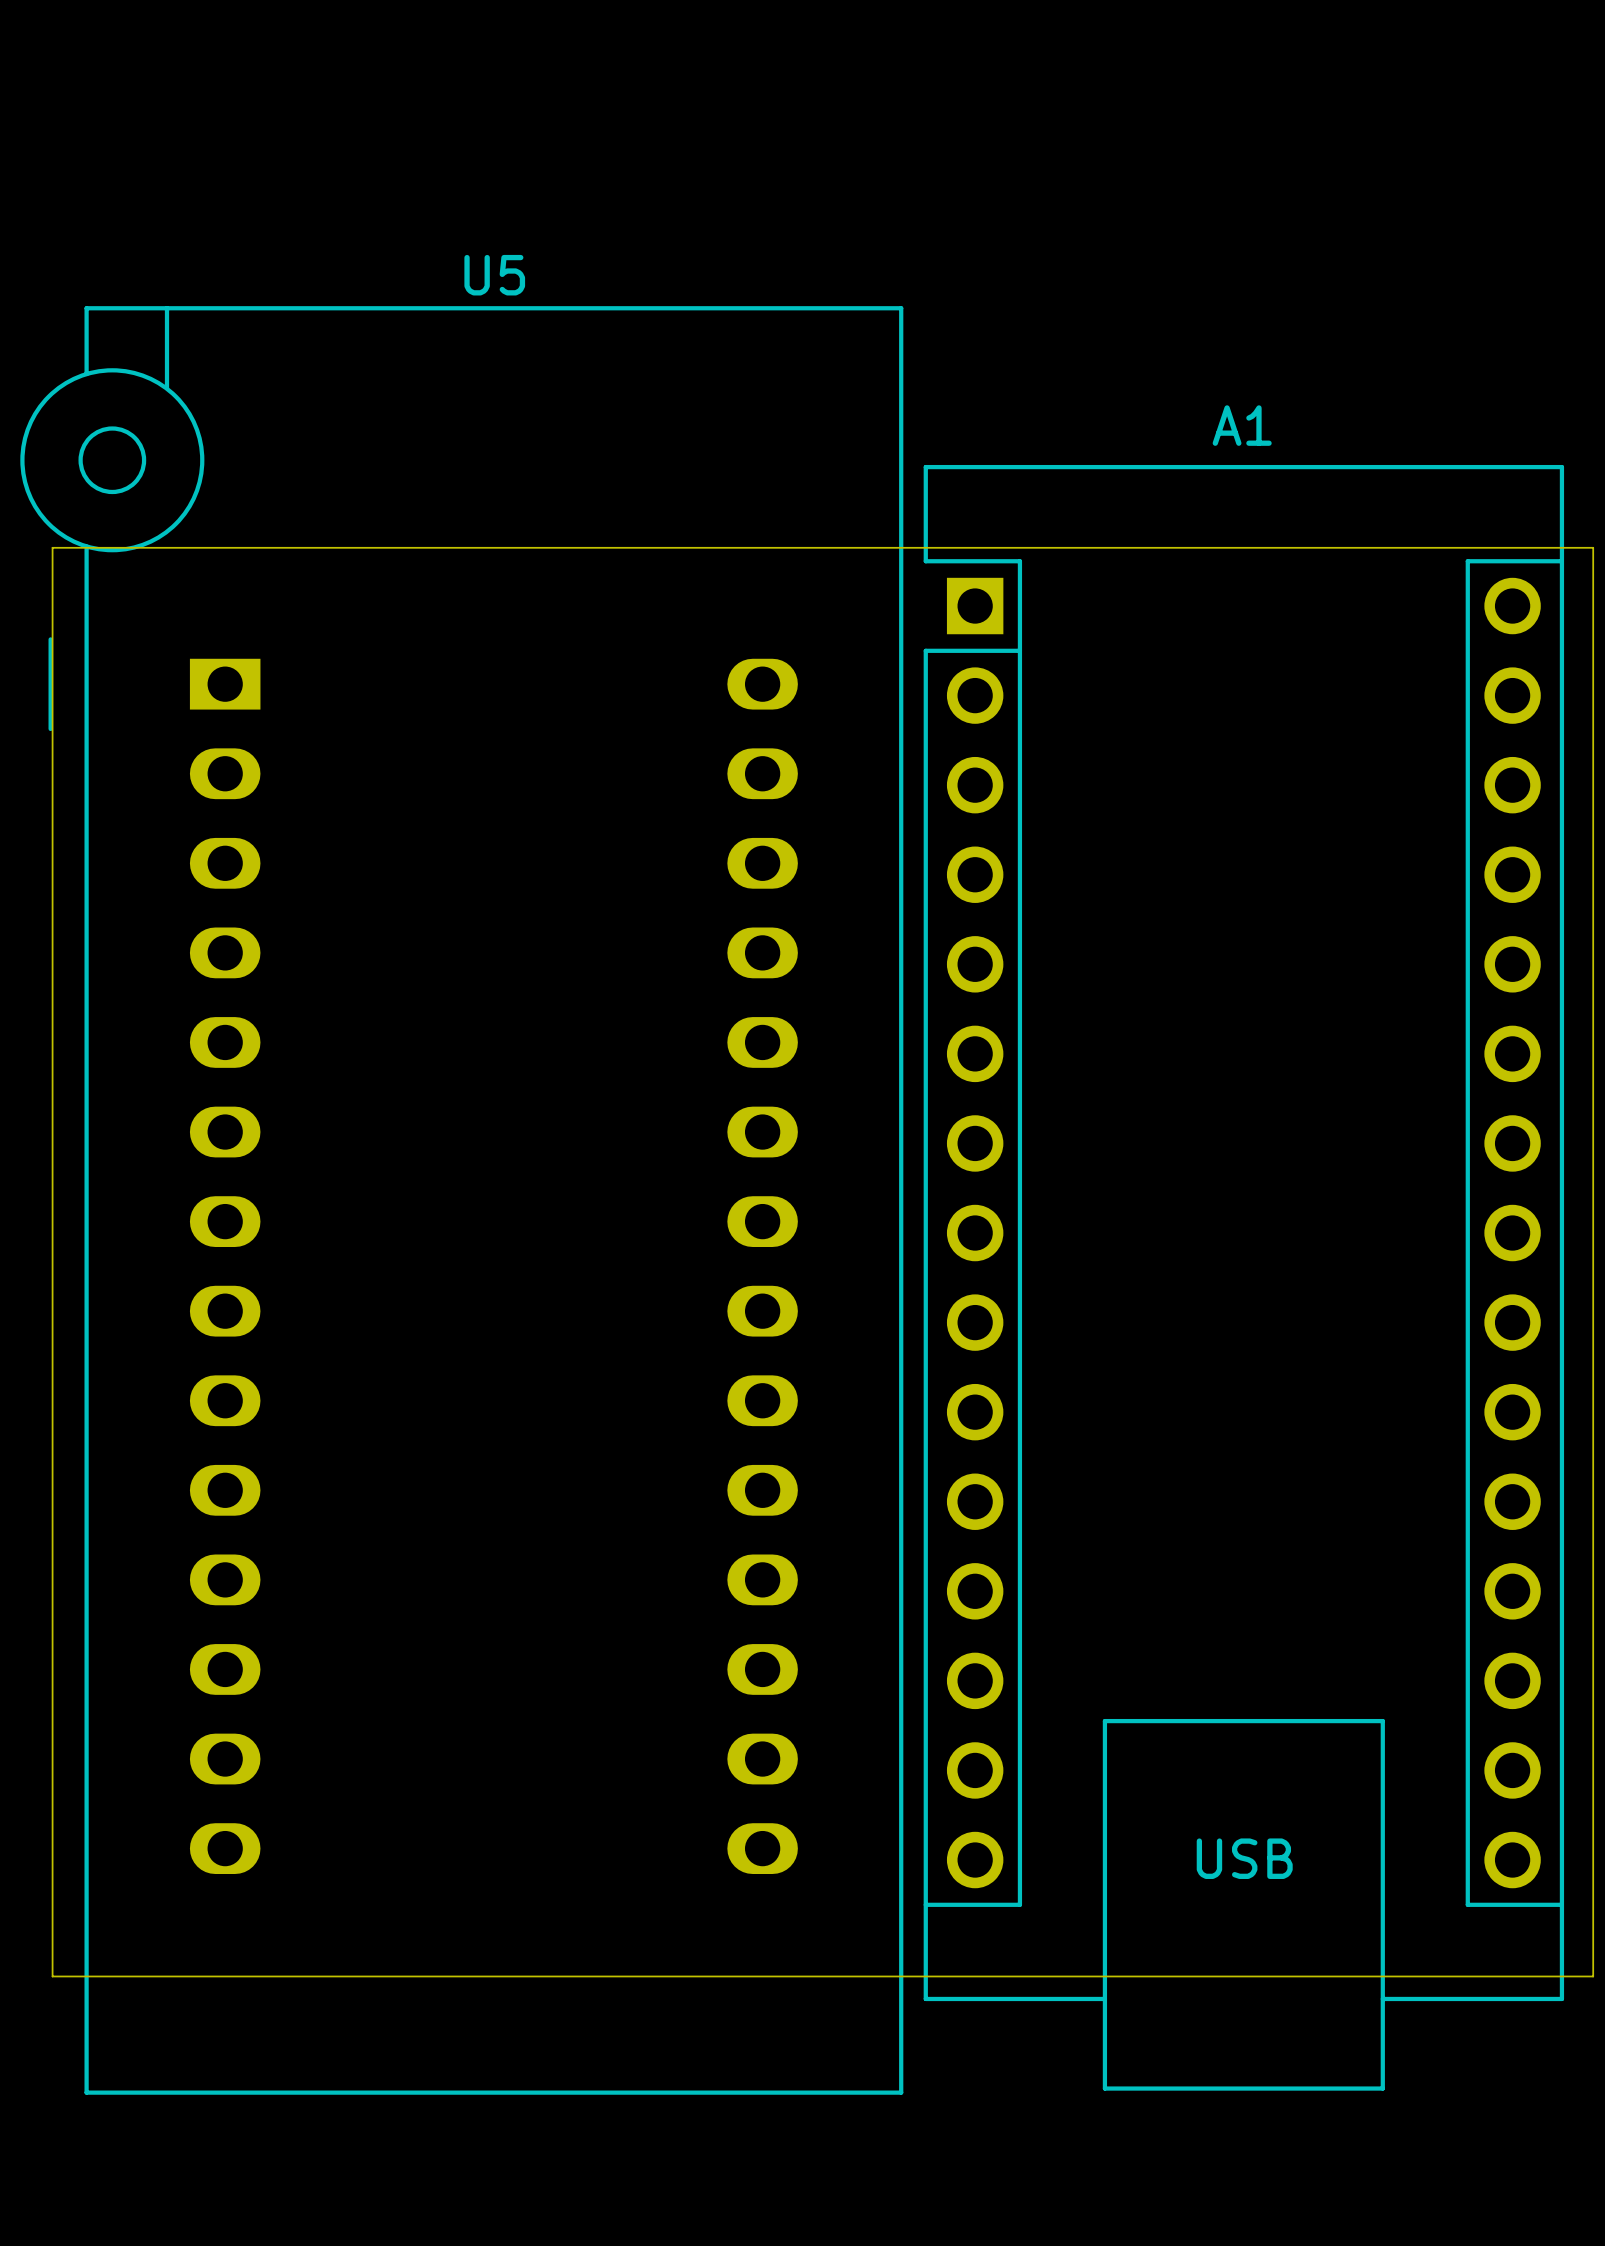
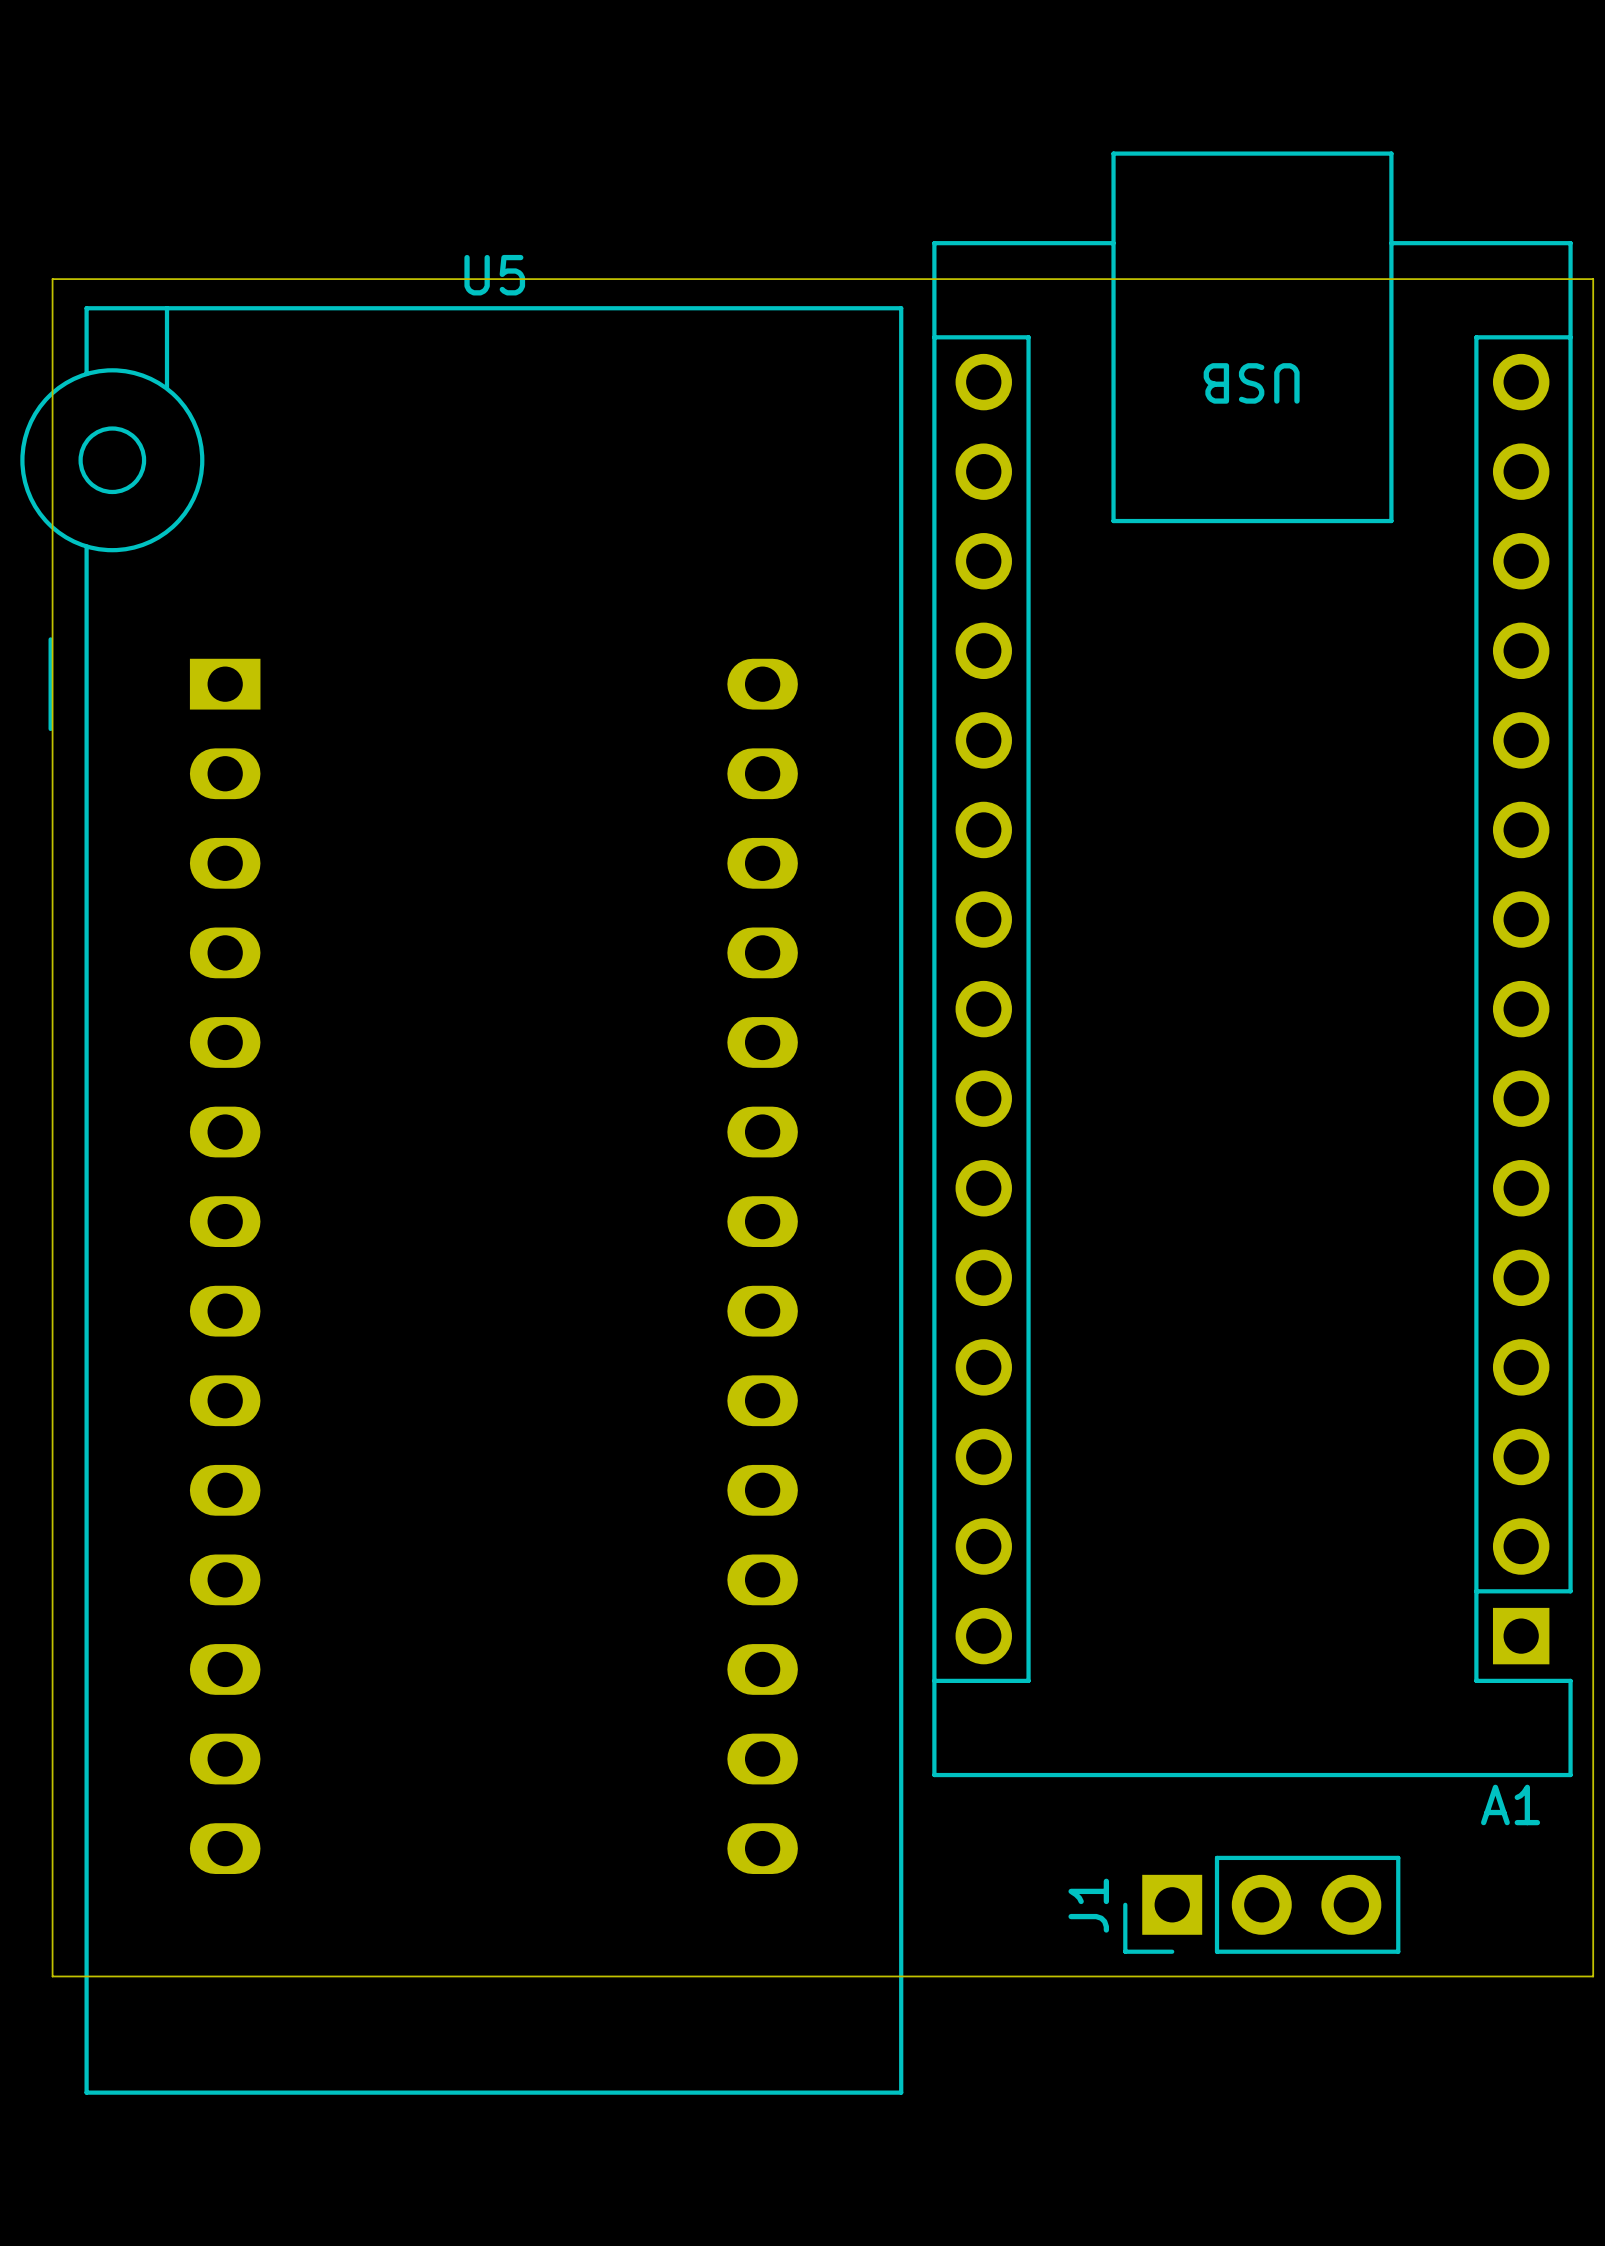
A1 name position: A1 (1242, 425) -> A1 (1510, 1804)
board edge: (52, 547) (1593, 547) -> (52, 547) (52, 279) (1593, 279) (1593, 547)
A1 rotation: 0° (1243, 1277) -> 180° (1252, 964)
J1: none -> (1261, 1904)

